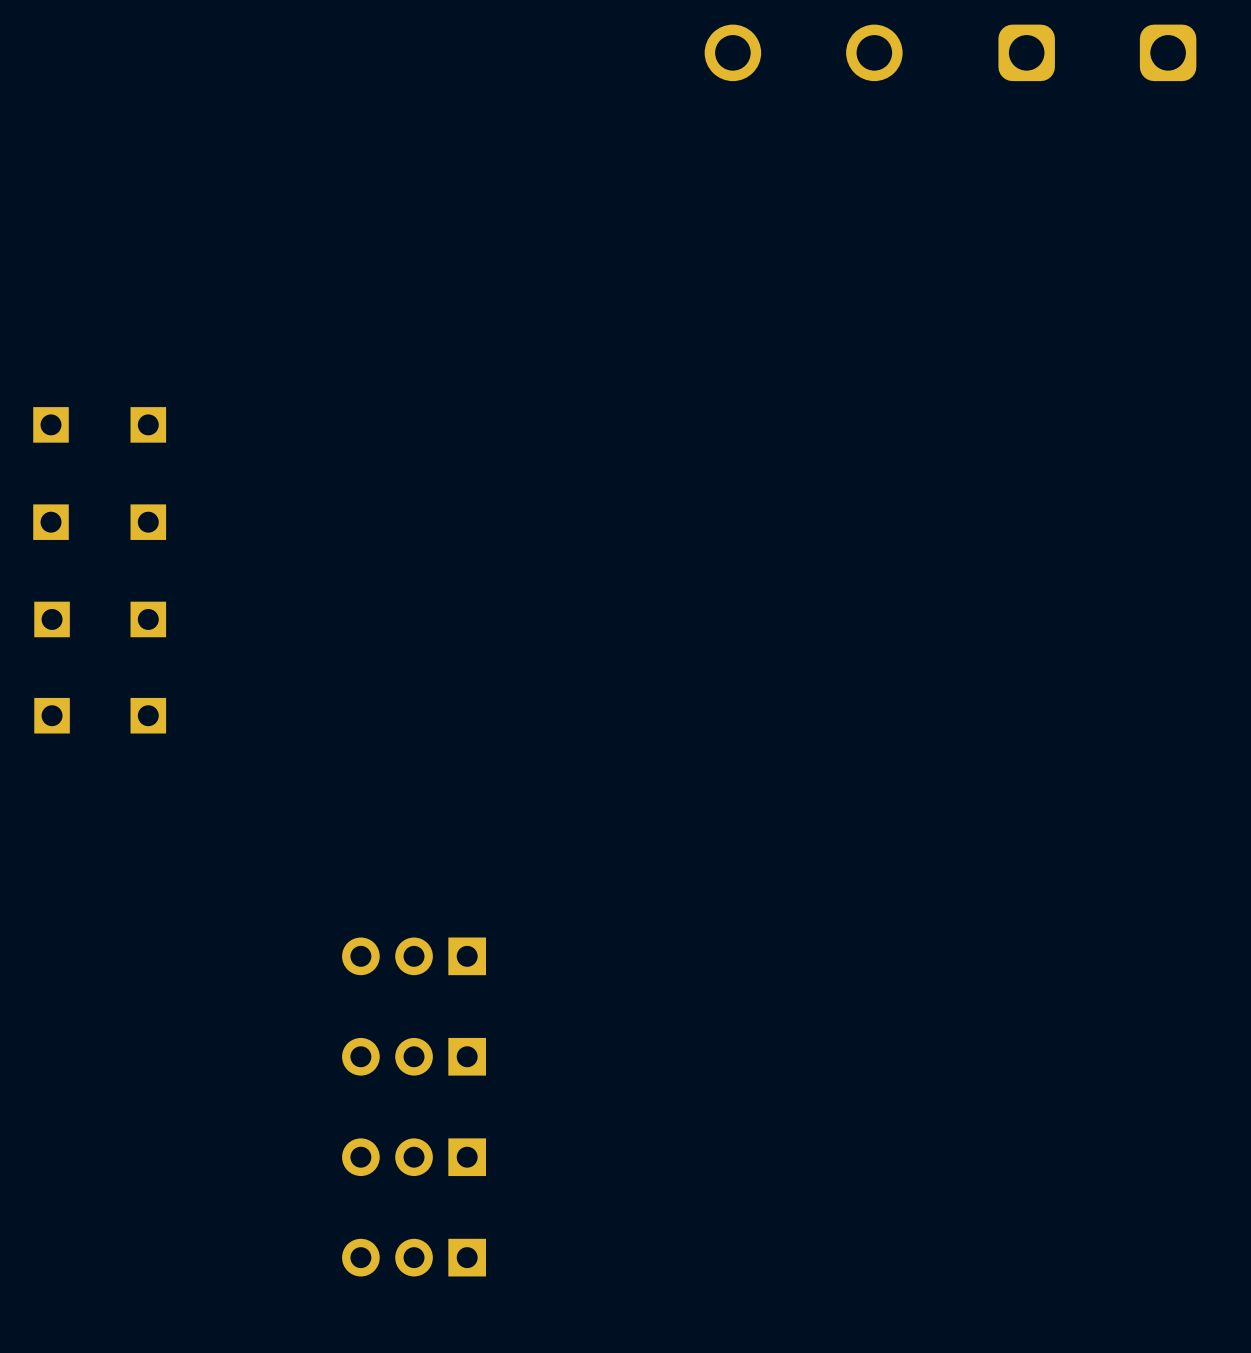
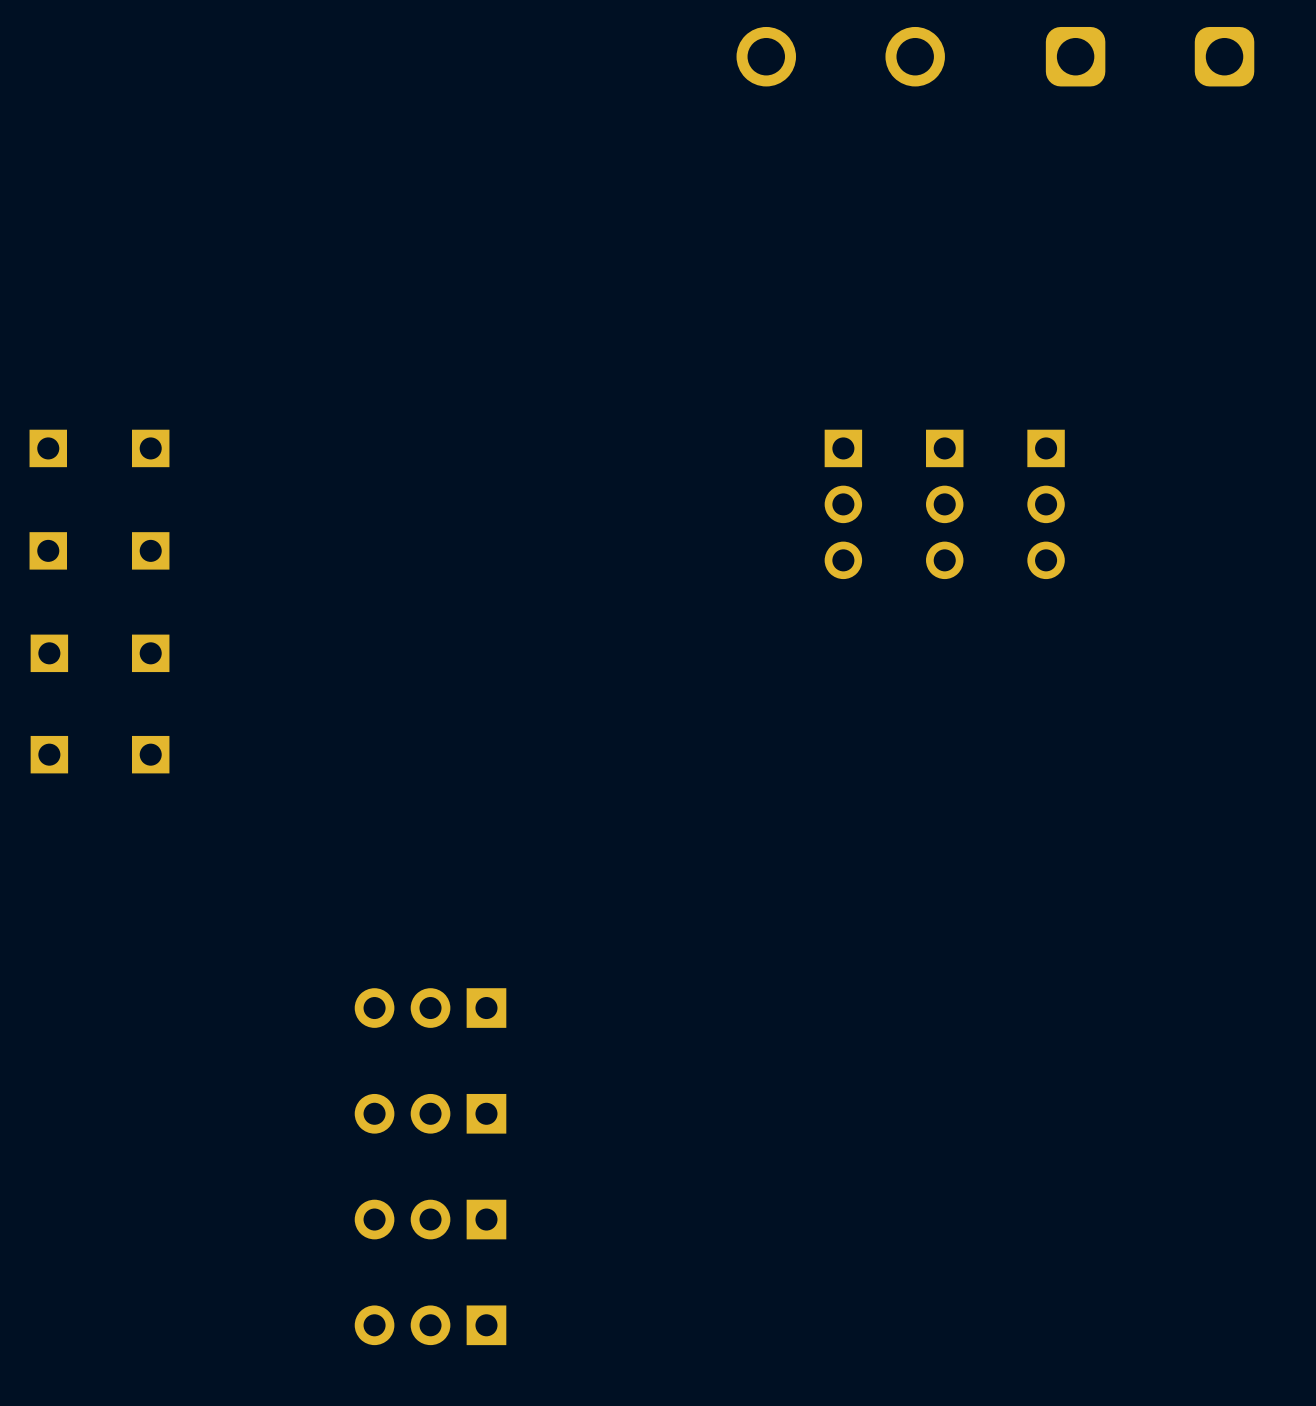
part: none -> (843, 504)
part: none -> (944, 504)
part: none -> (1046, 504)

